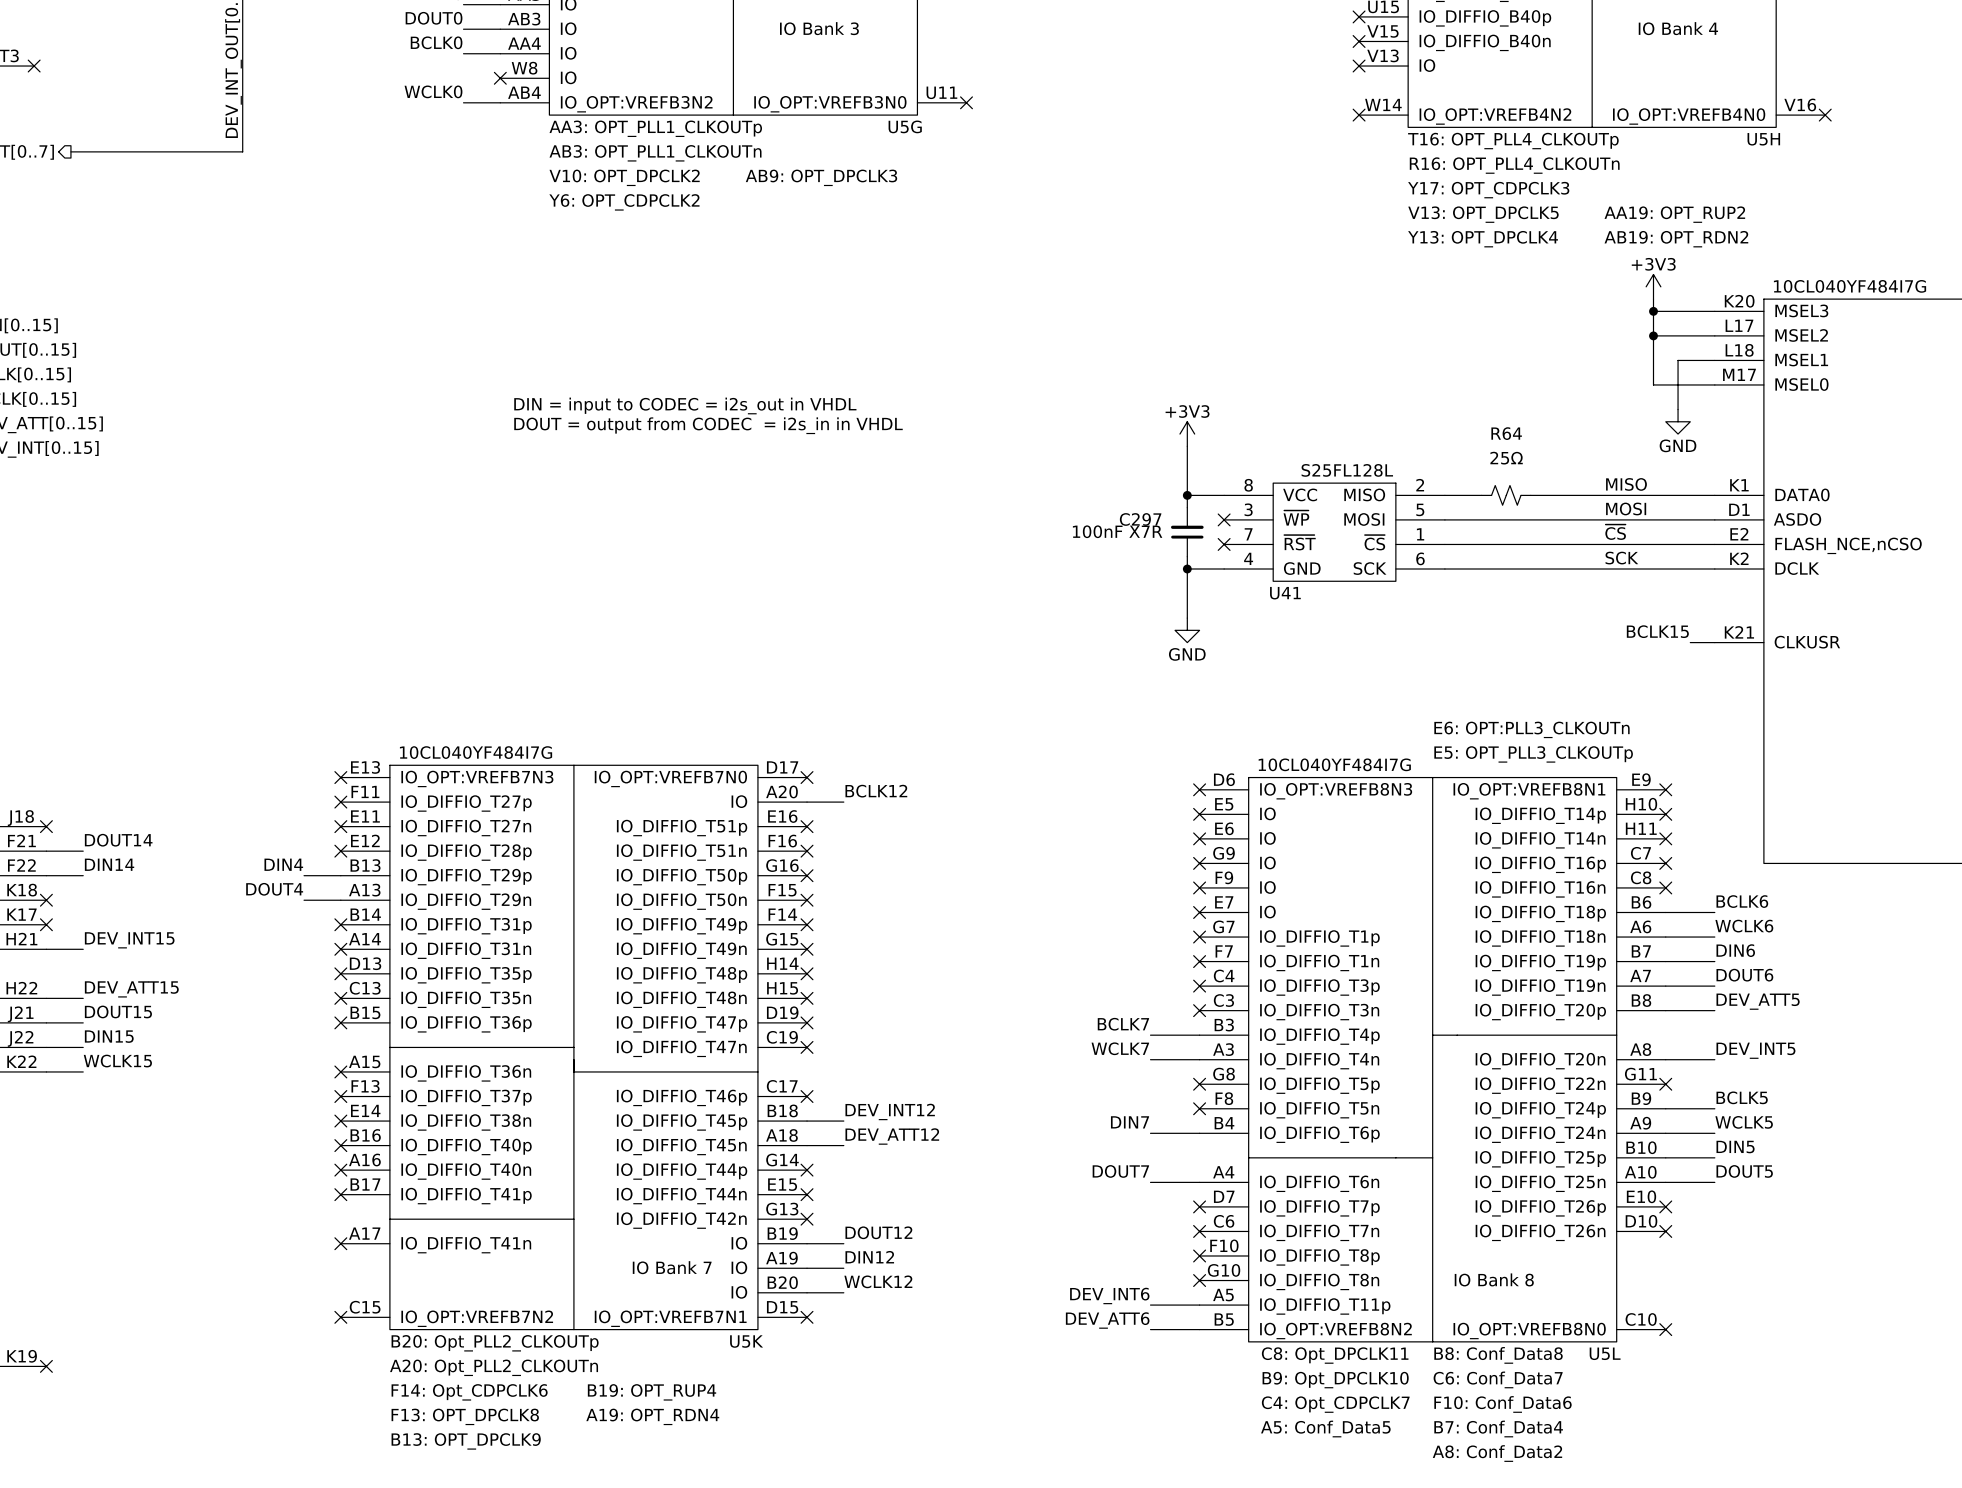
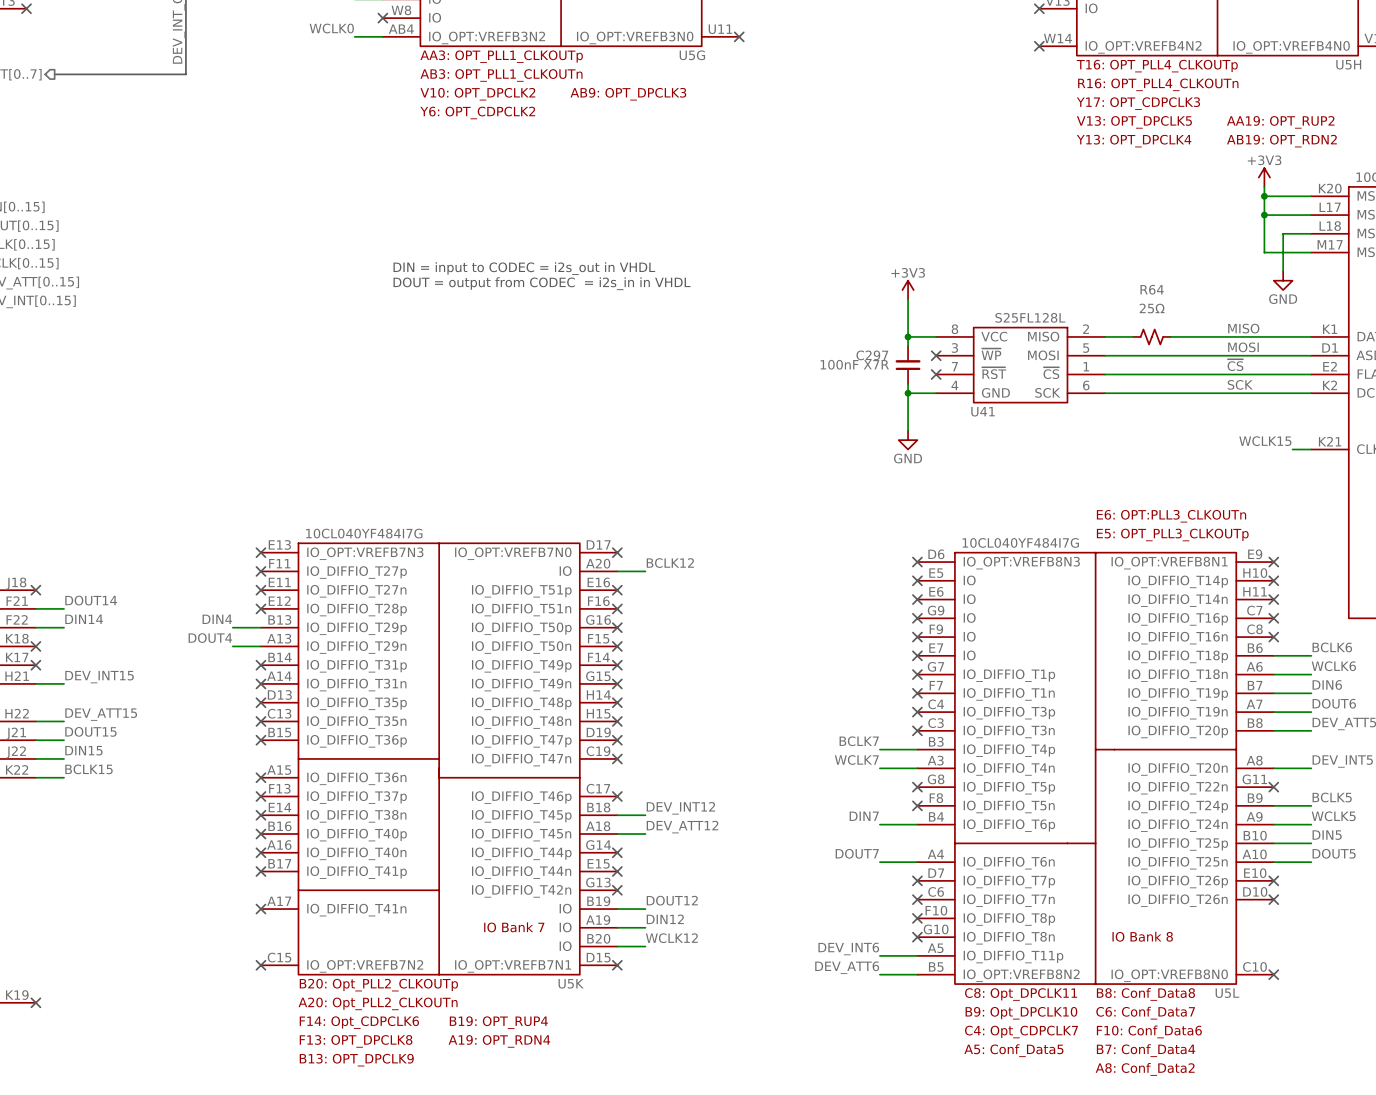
label: BCLK15 (1657, 631) -> WCLK15 (1265, 441)
label: WCLK15 (117, 1061) -> BCLK15 (88, 769)

